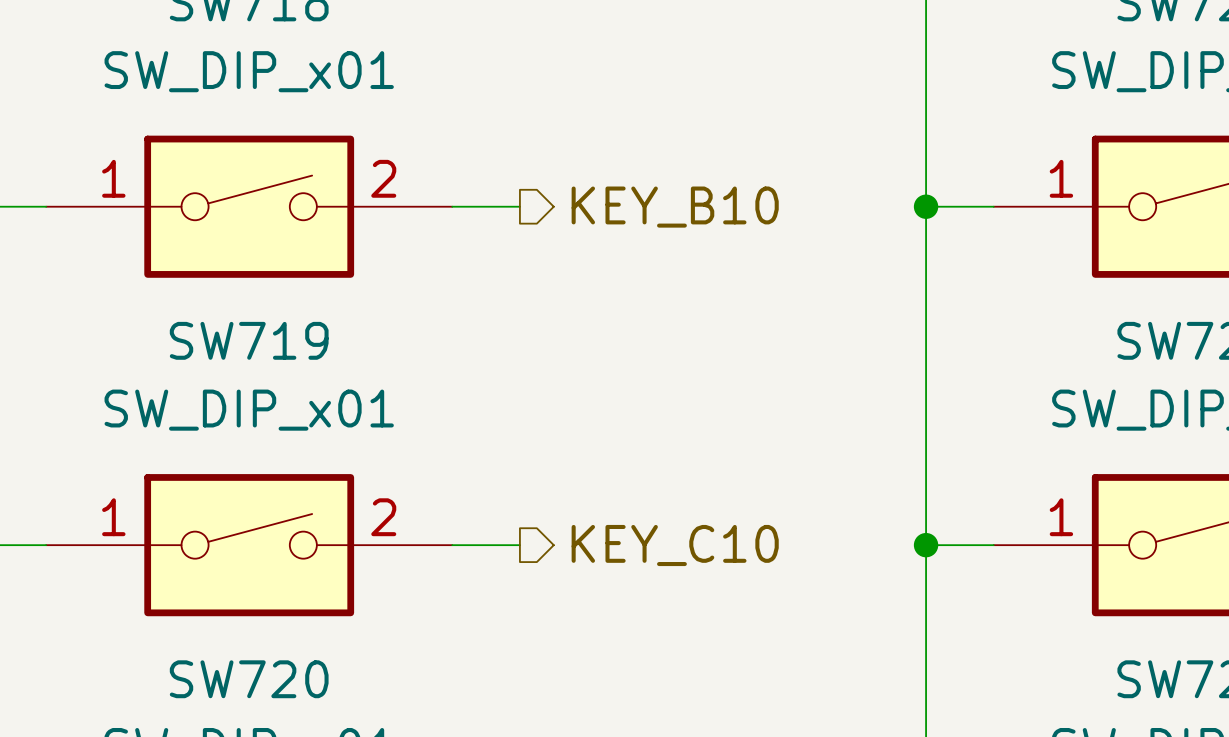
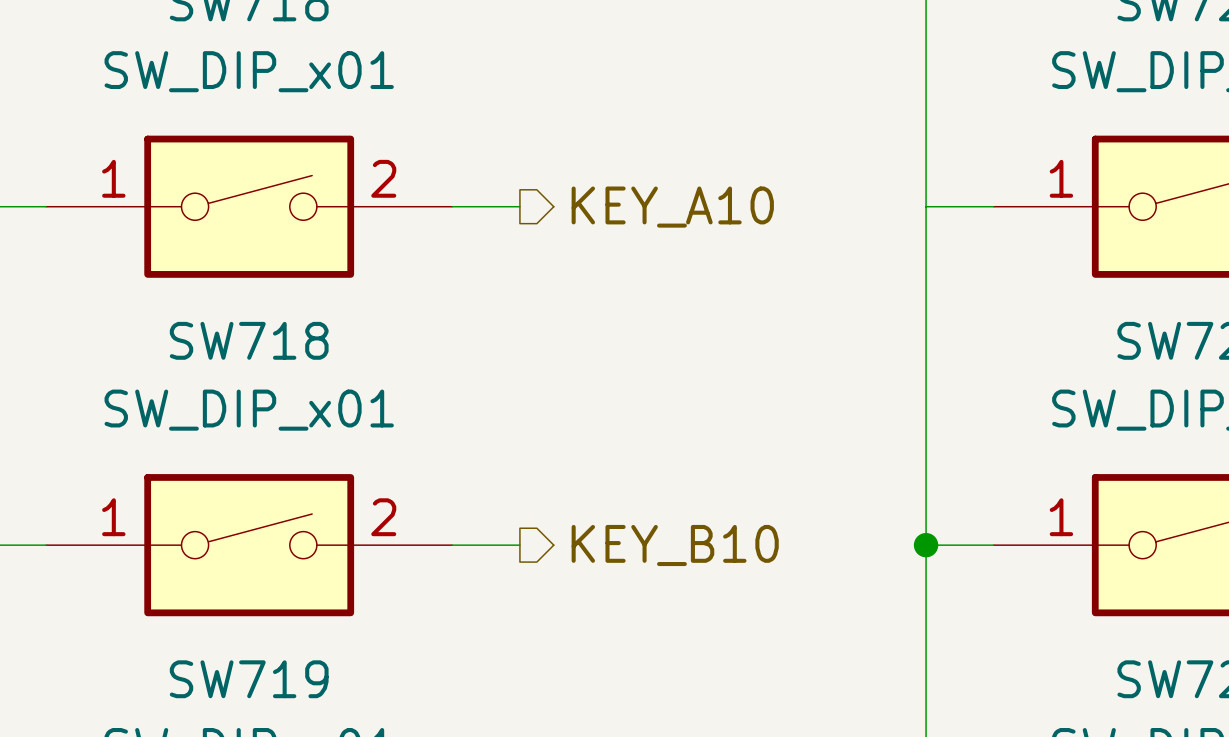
junction: (926, 206) -> none
hierarchical label: KEY_B10 (675, 207) -> KEY_A10 (672, 207)
SW719 name: SW719 (249, 340) -> SW718 (249, 340)
hierarchical label: KEY_C10 (675, 545) -> KEY_B10 (675, 545)
SW720 name: SW720 (249, 679) -> SW719 (249, 679)

